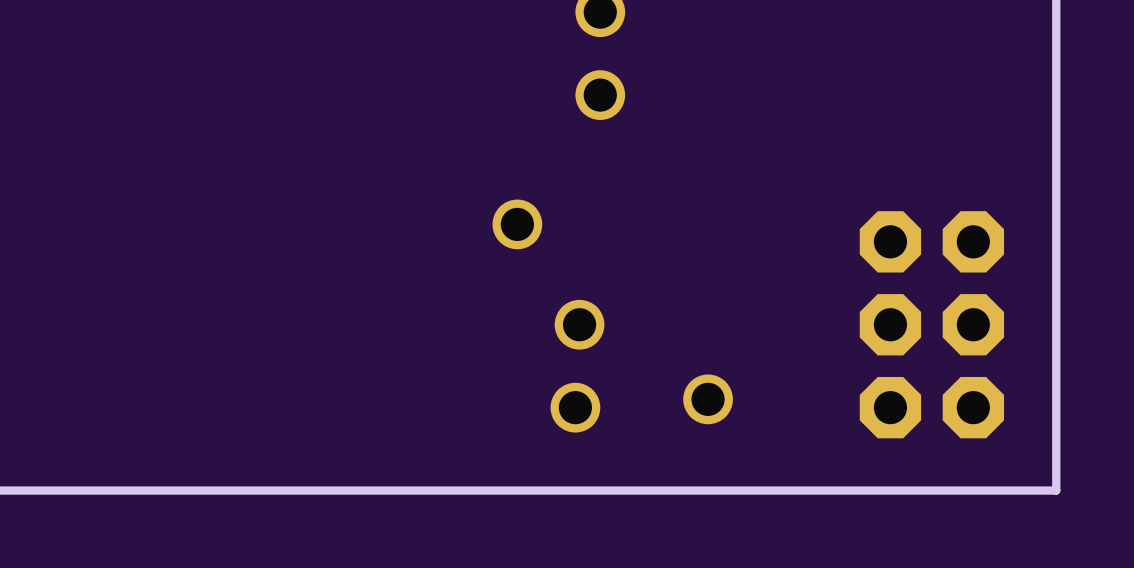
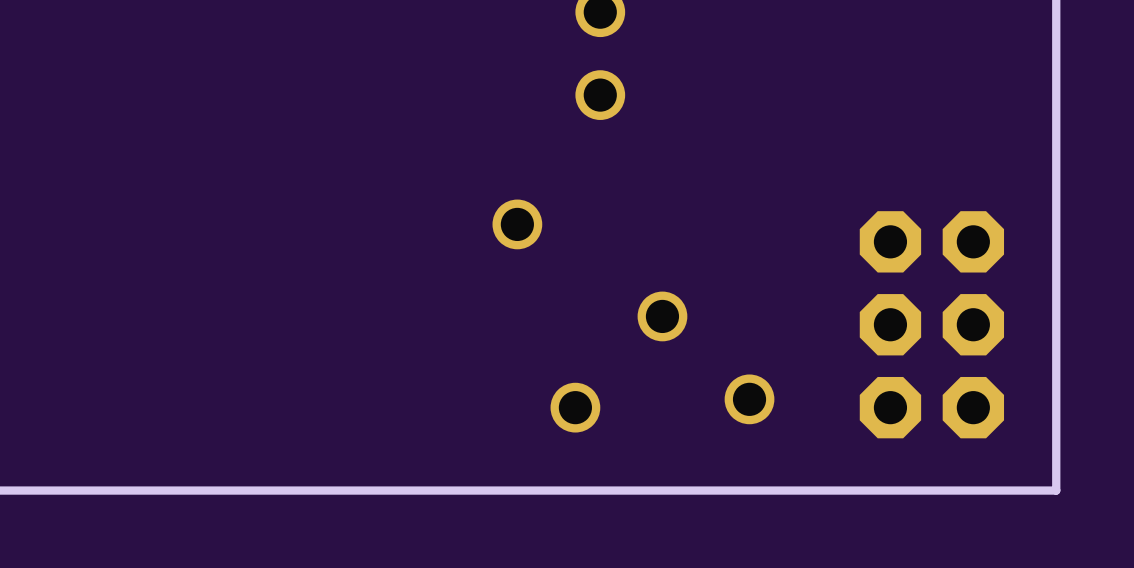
part: none -> (662, 316)
part: (579, 324) -> none
part position: (708, 399) -> (749, 399)

